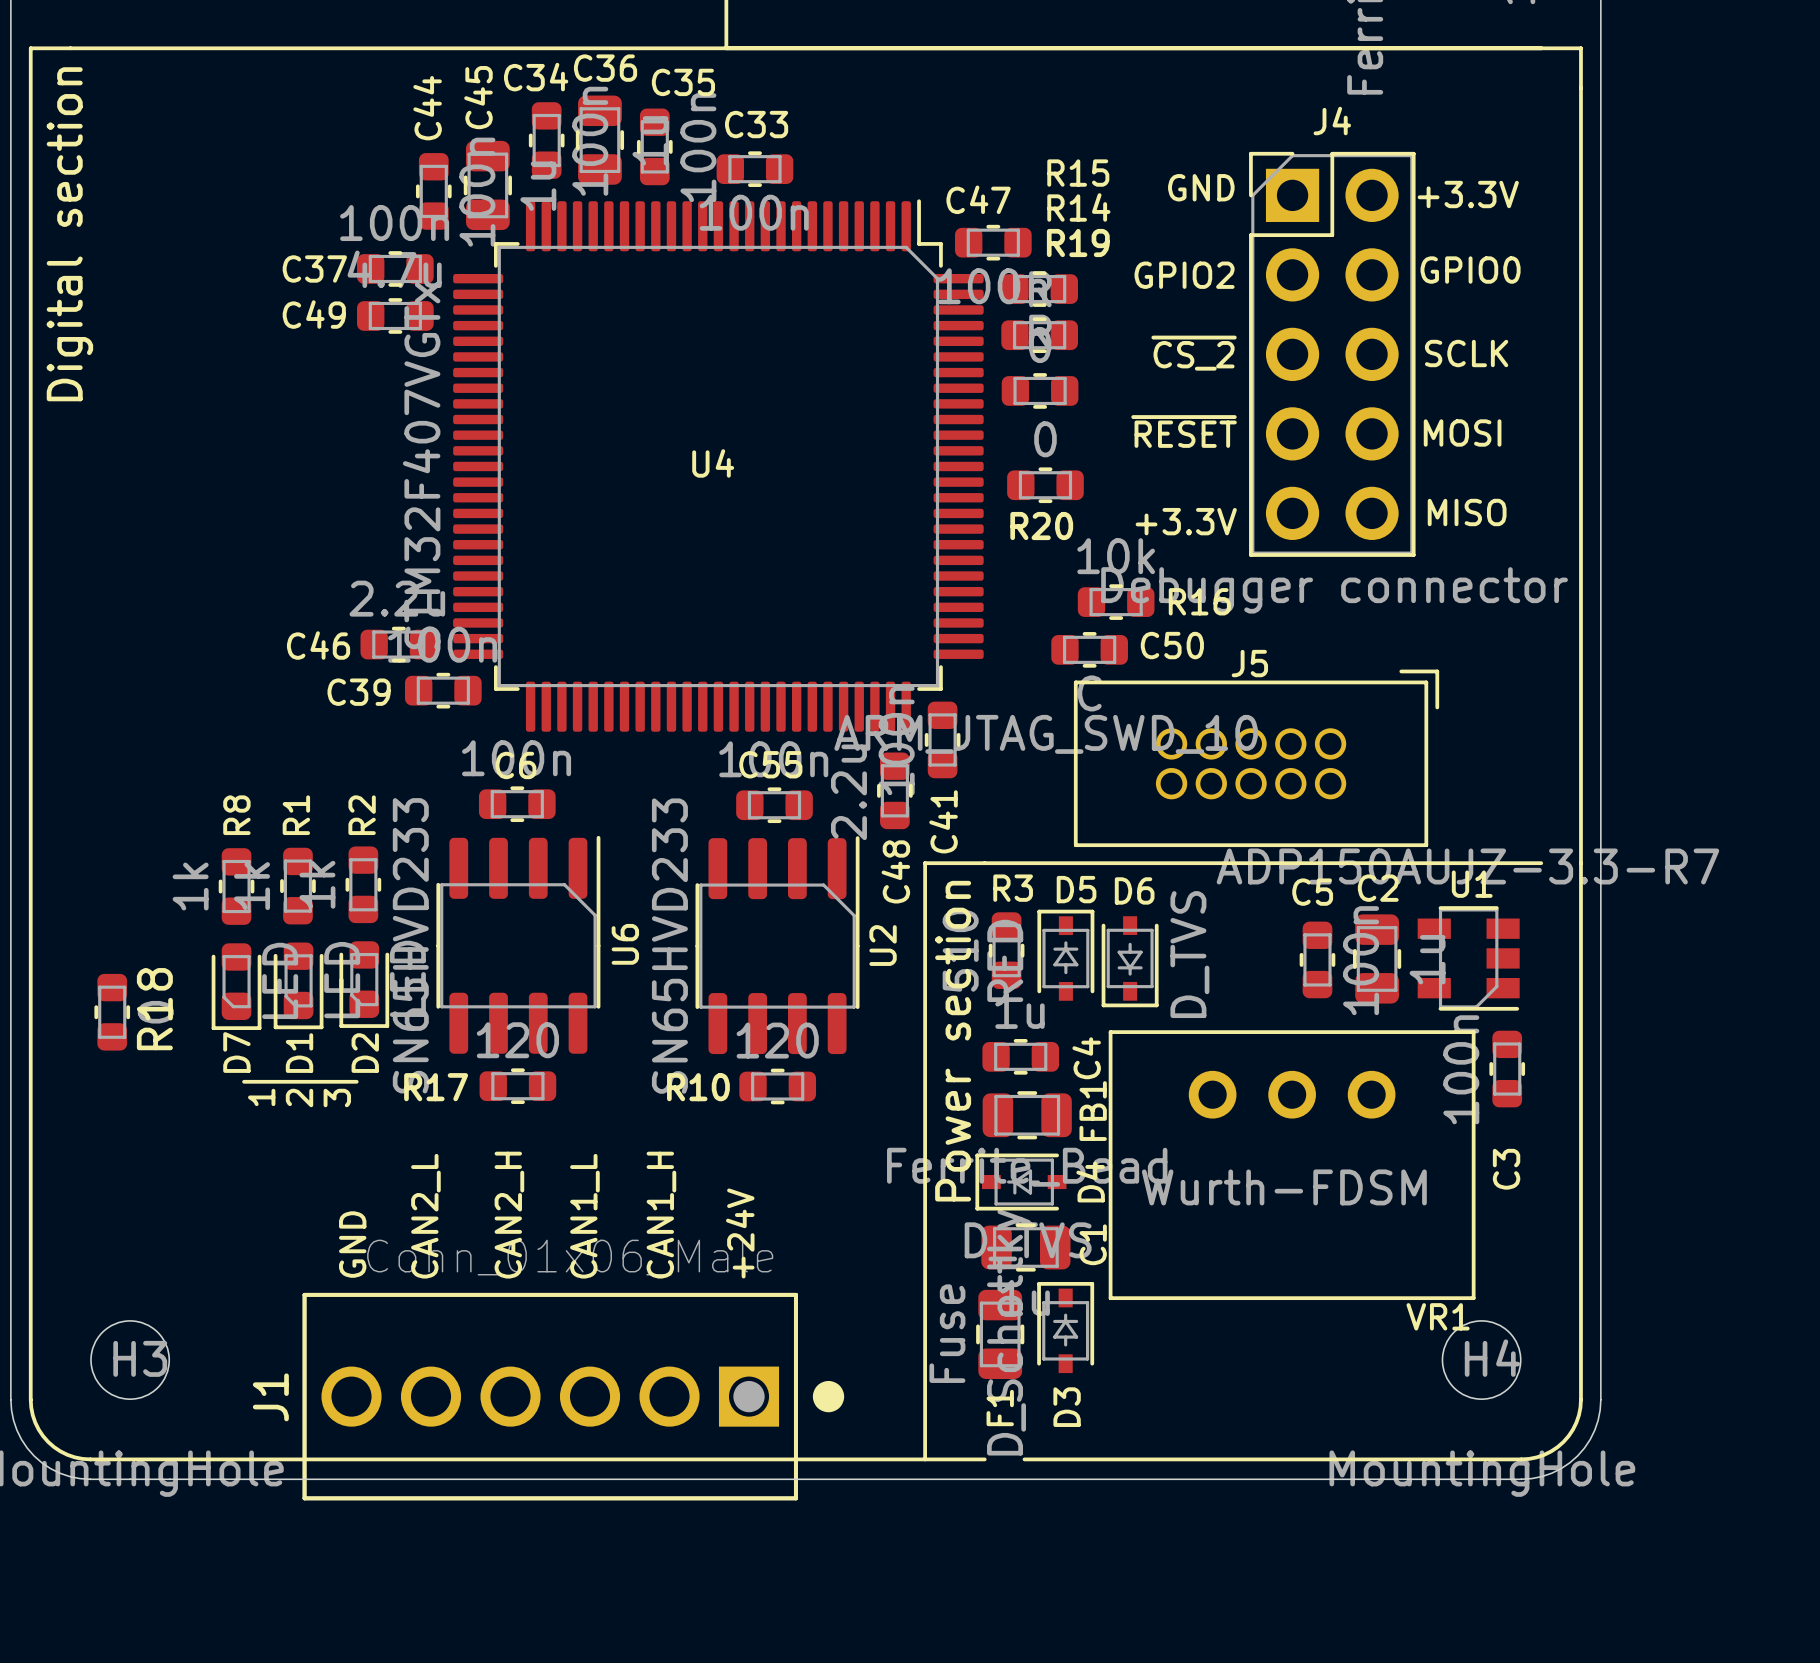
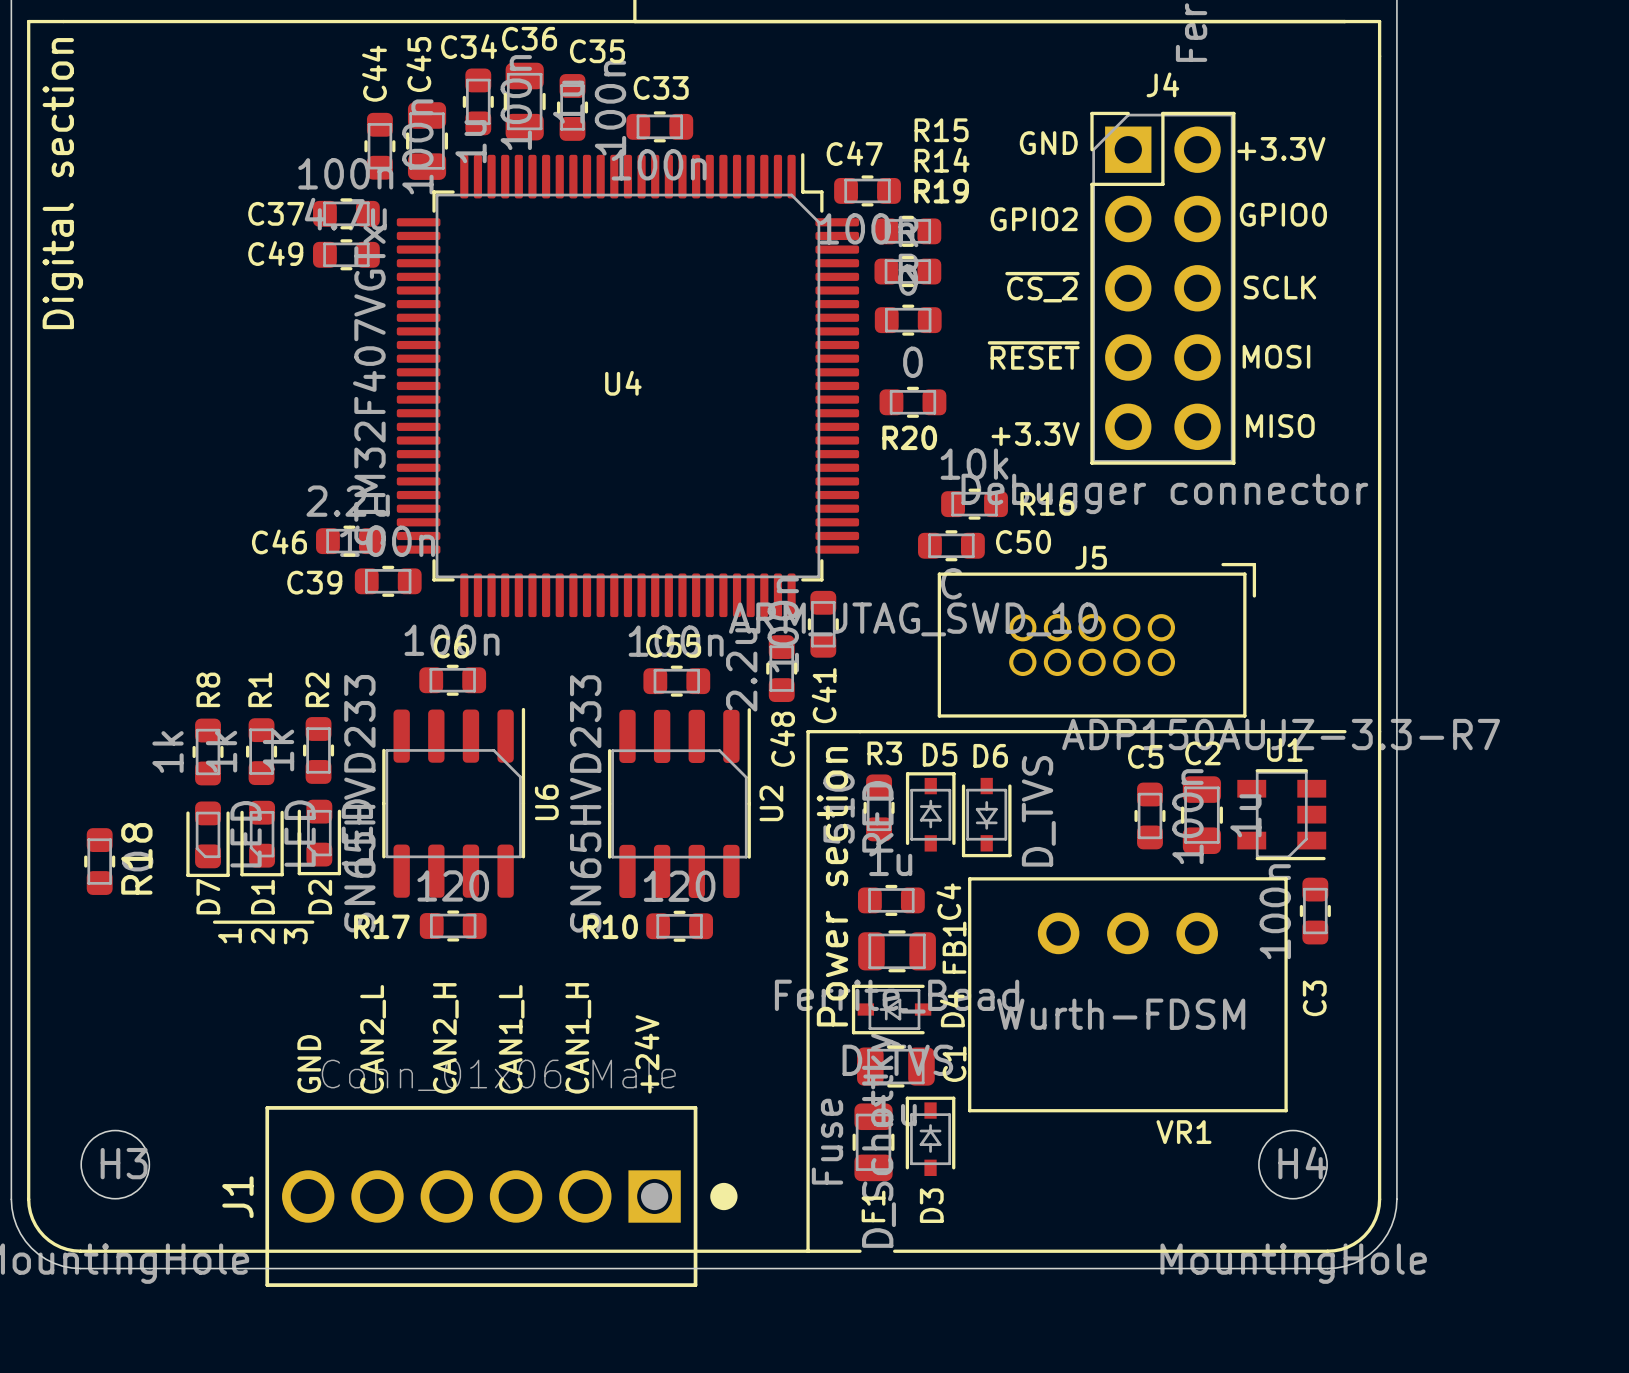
VR1 name position: VR1 (1438, 1316) -> VR1 (1183, 1132)

